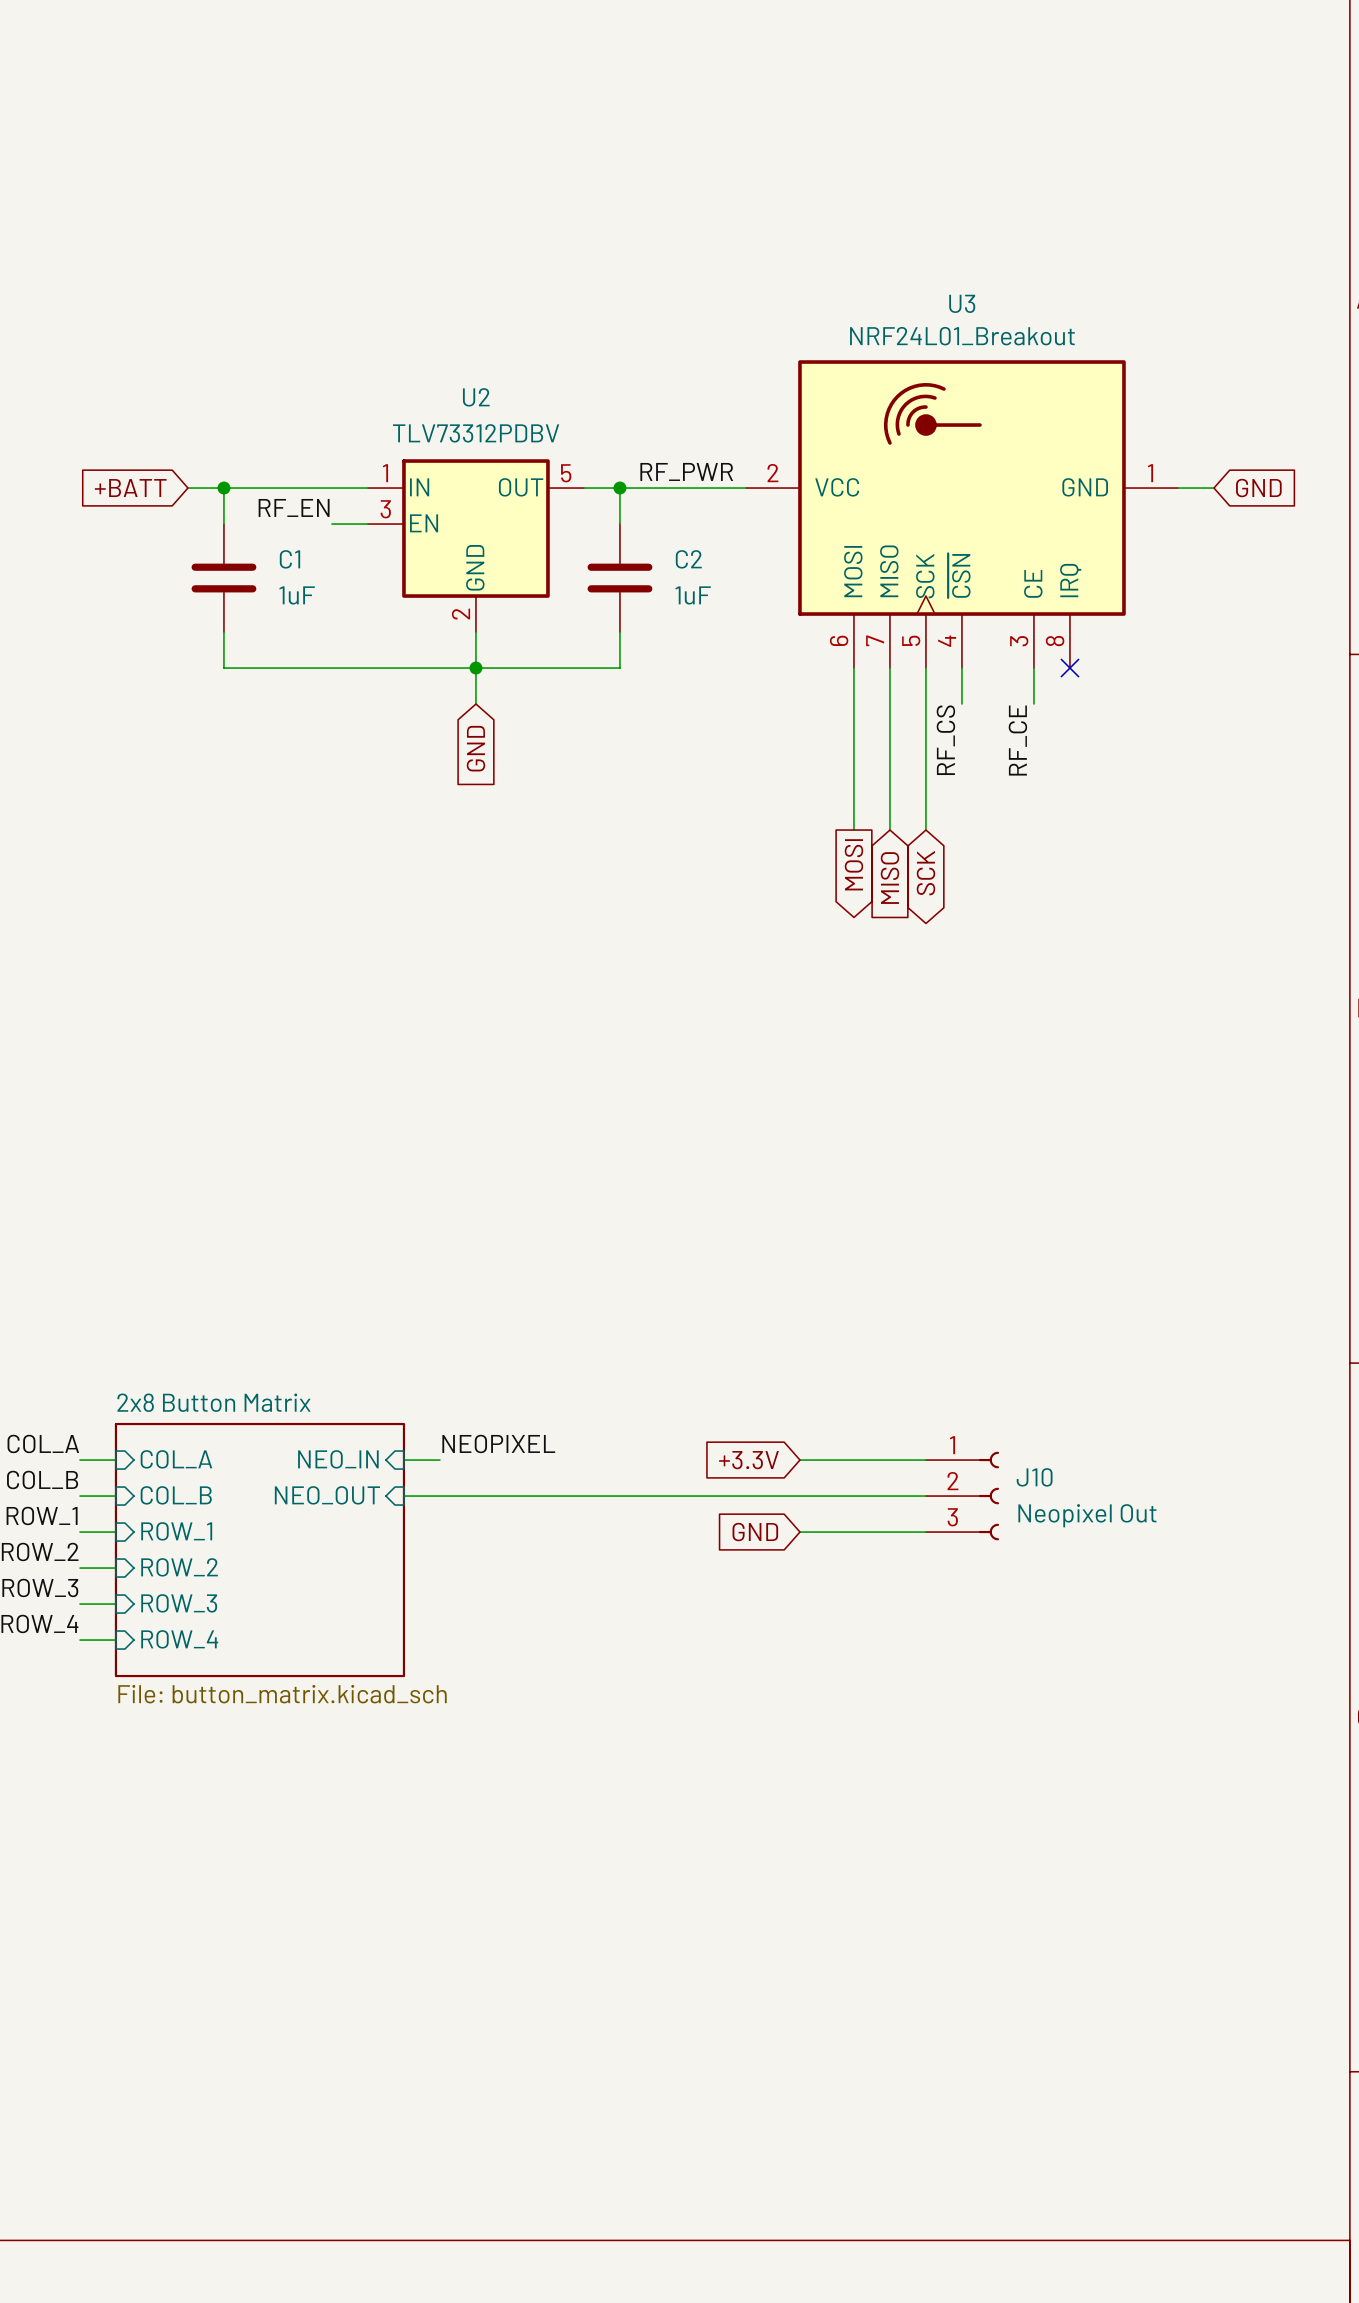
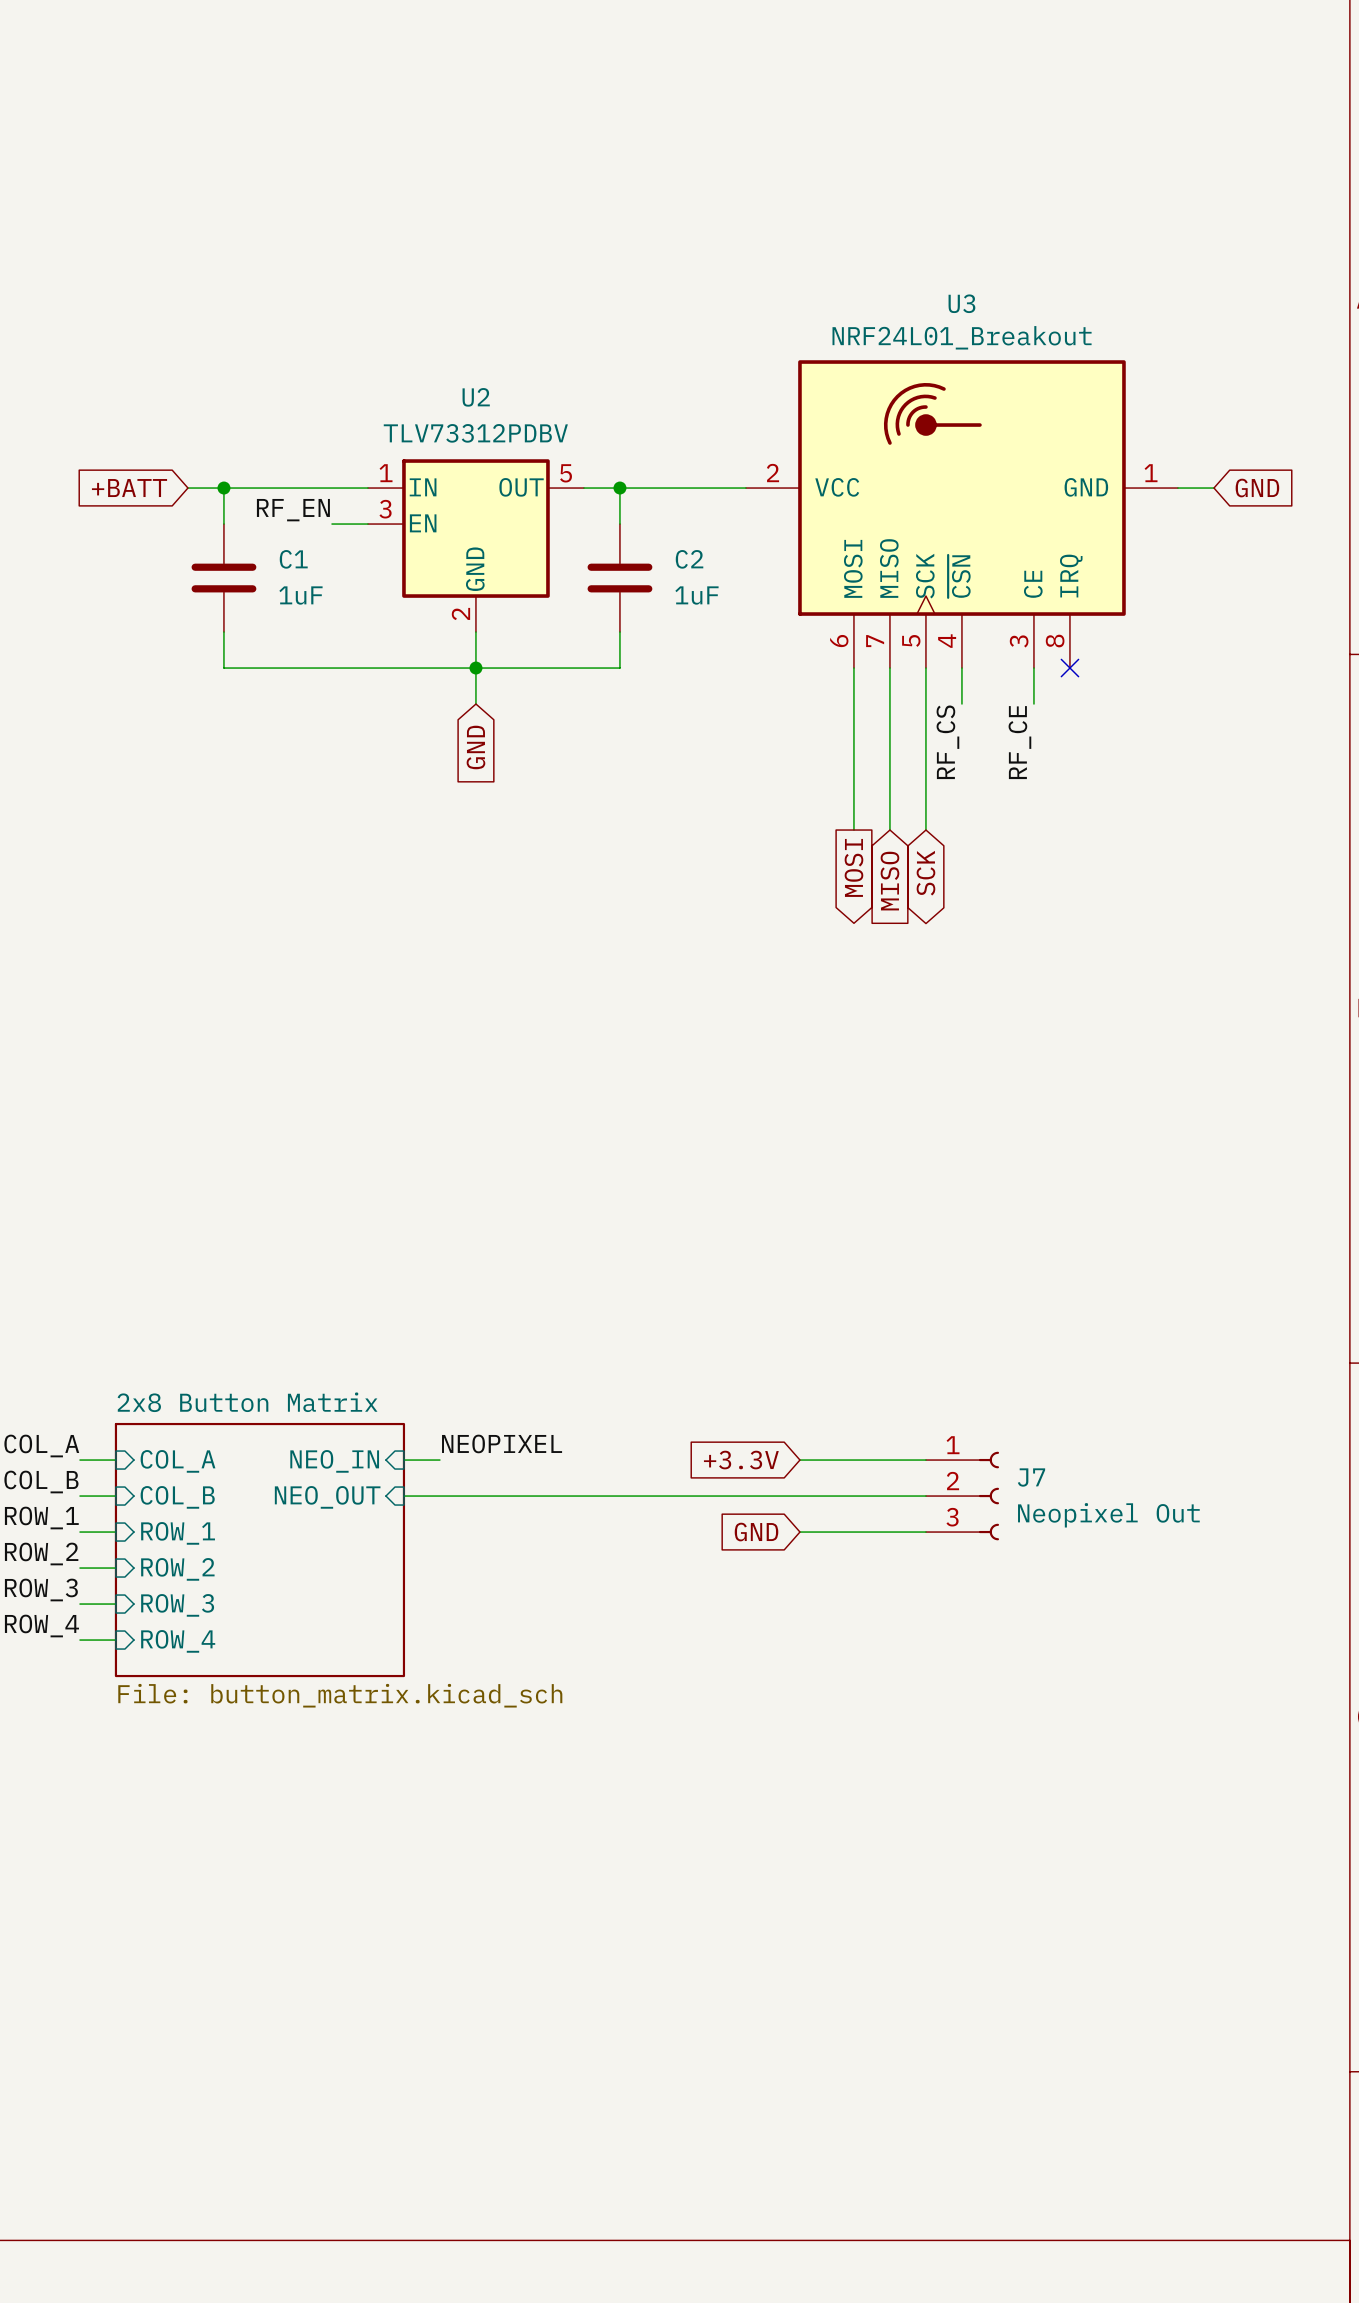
label: RF_PWR (686, 471) -> none
J10 name: J10 (1034, 1477) -> J7 (1031, 1477)

